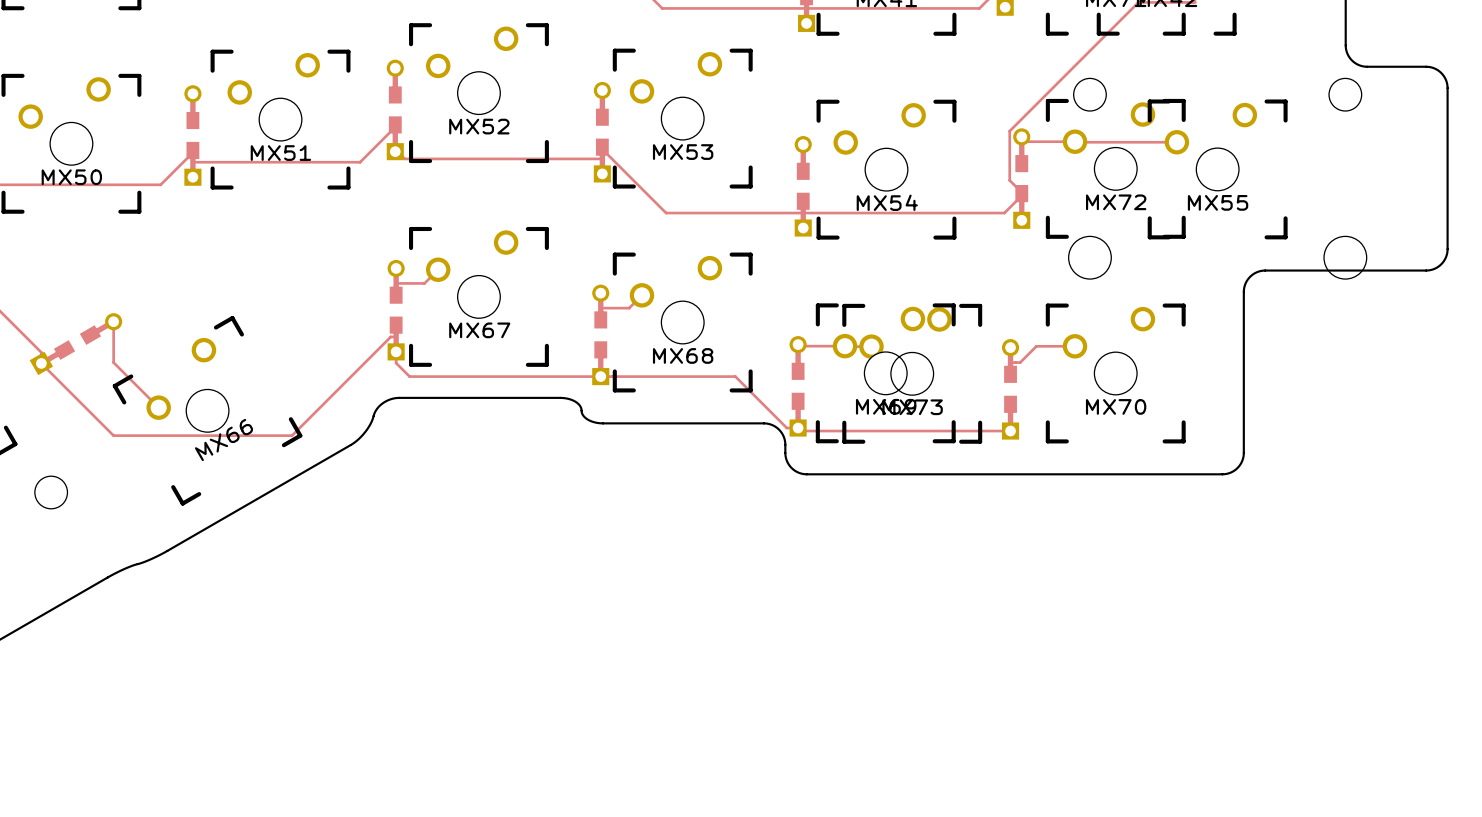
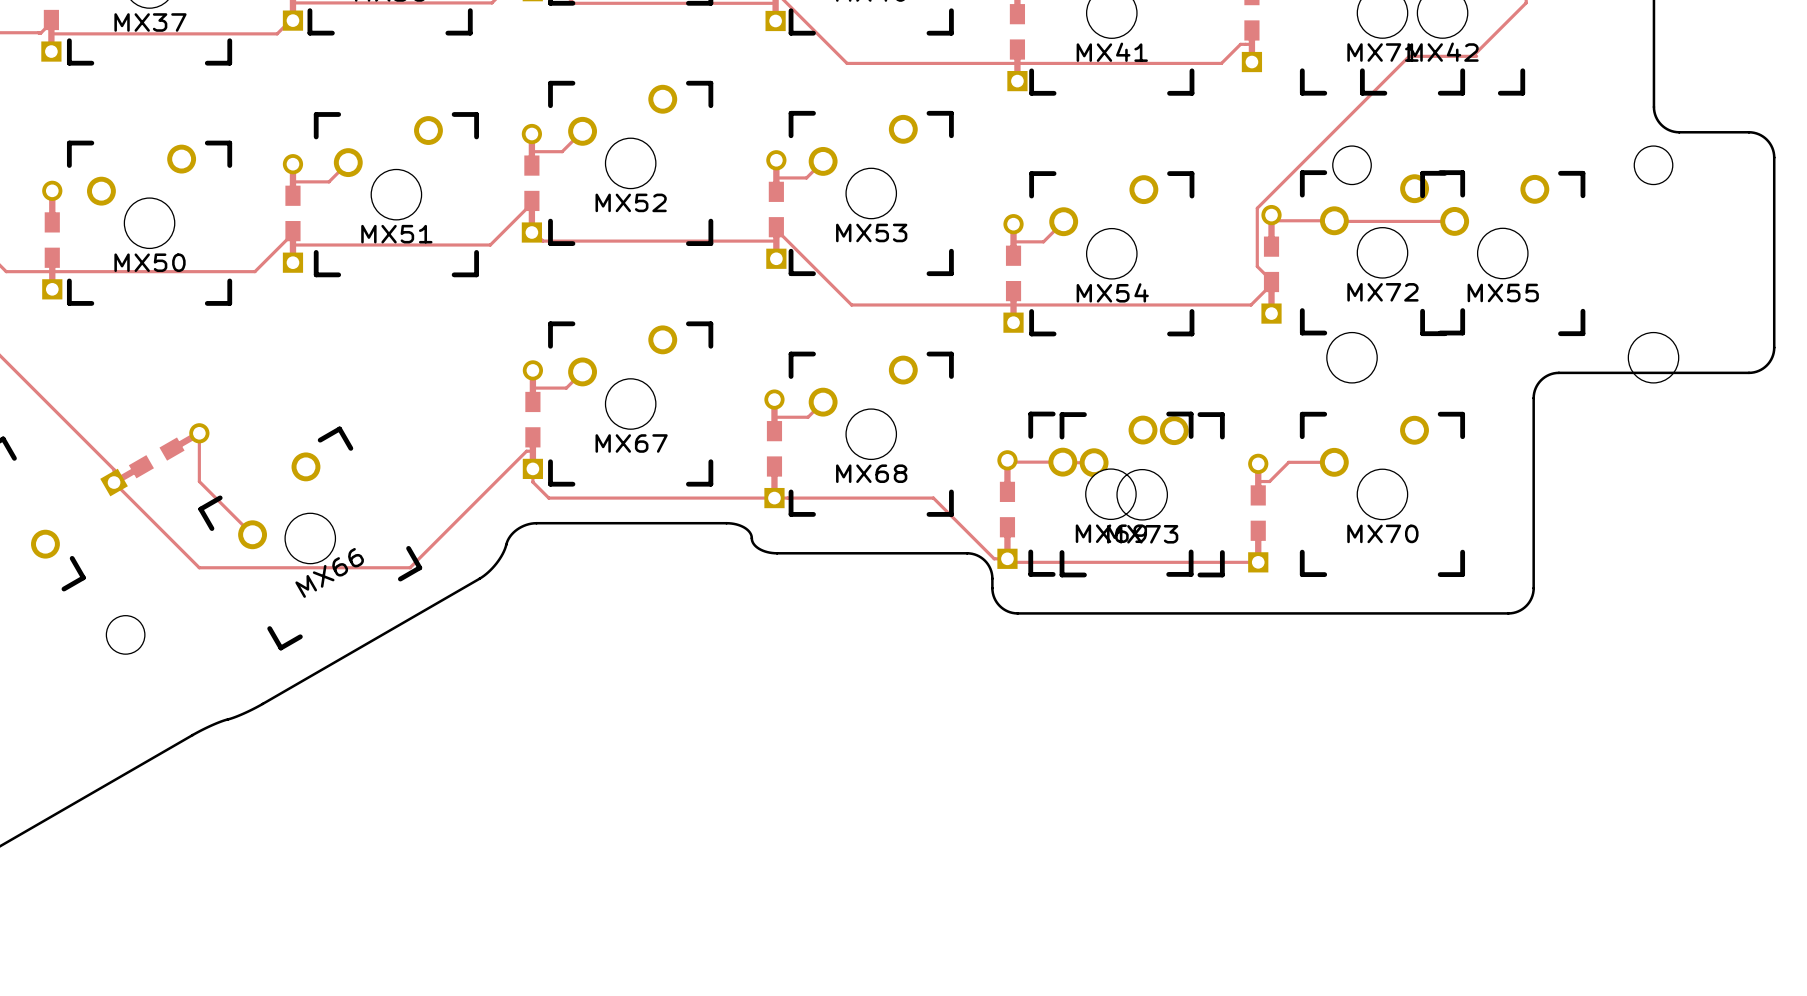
track: none -> (582, 131) (562, 151) (531, 151)
track: none -> (823, 161) (806, 177) (776, 177)
track: none -> (348, 162) (329, 181) (292, 181)
track: none -> (1063, 221) (1043, 241) (1013, 241)

